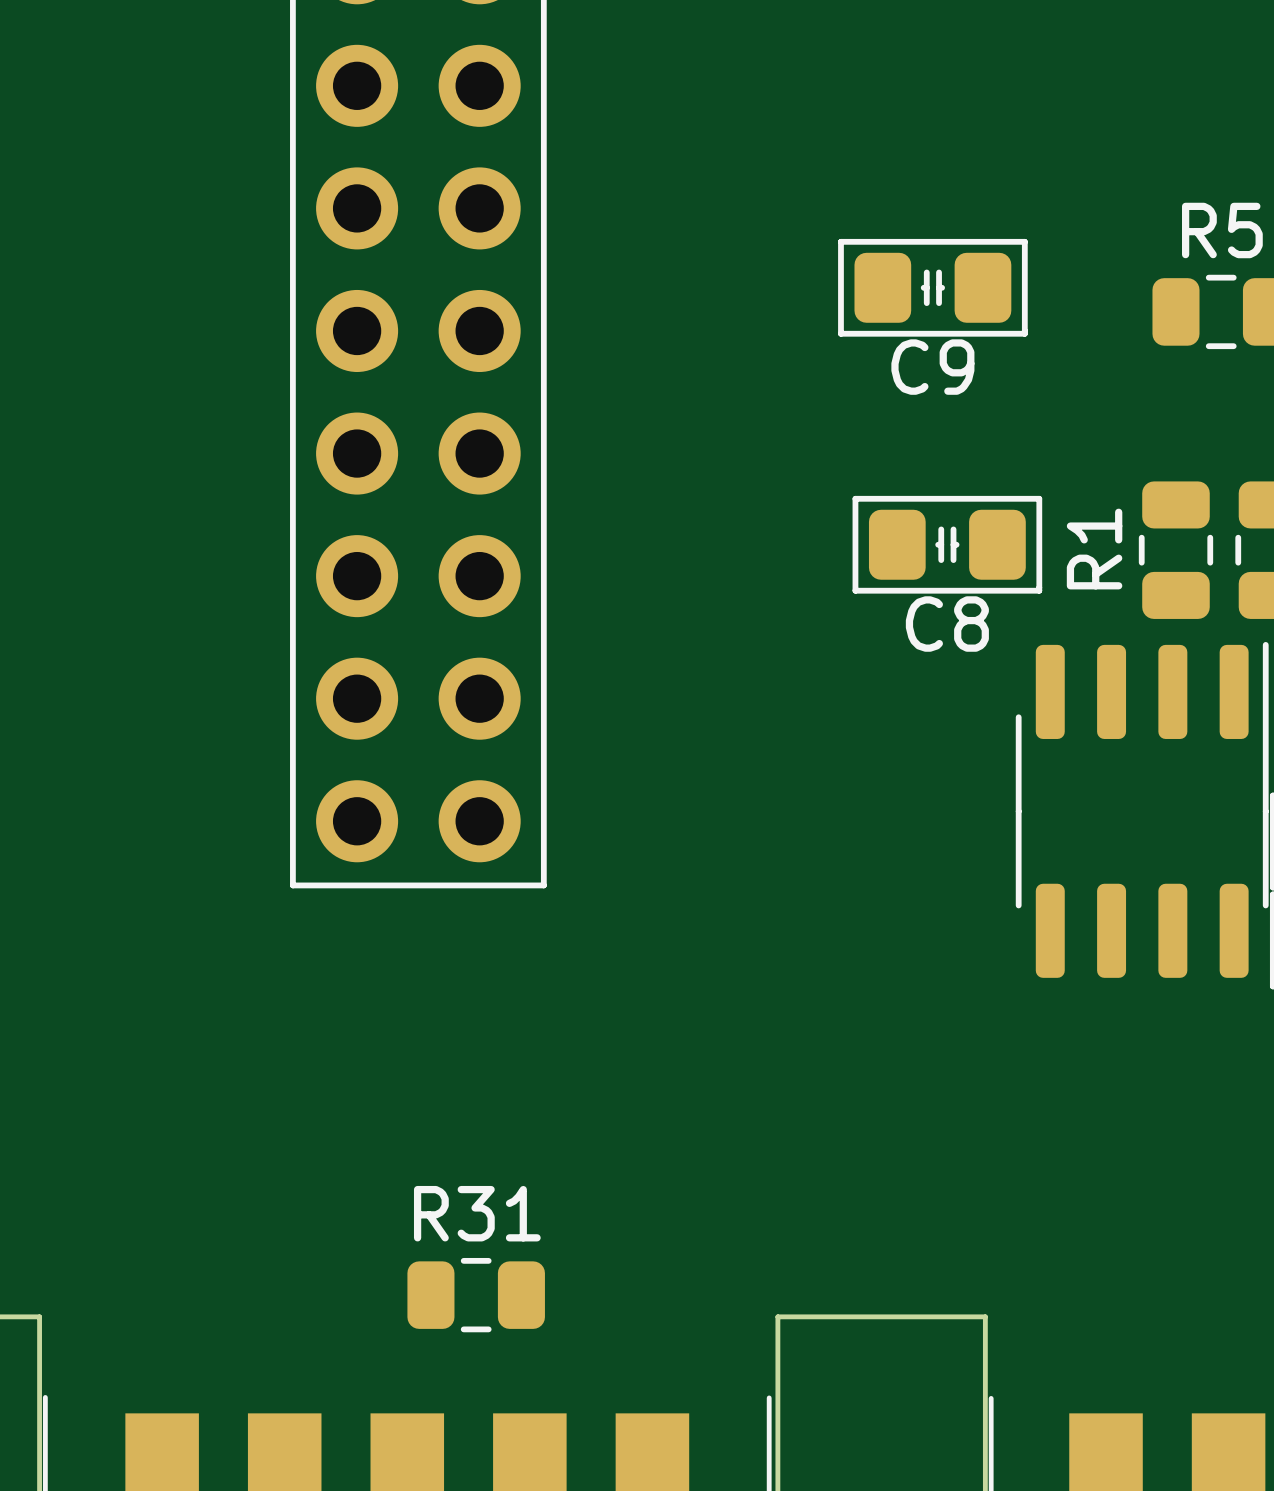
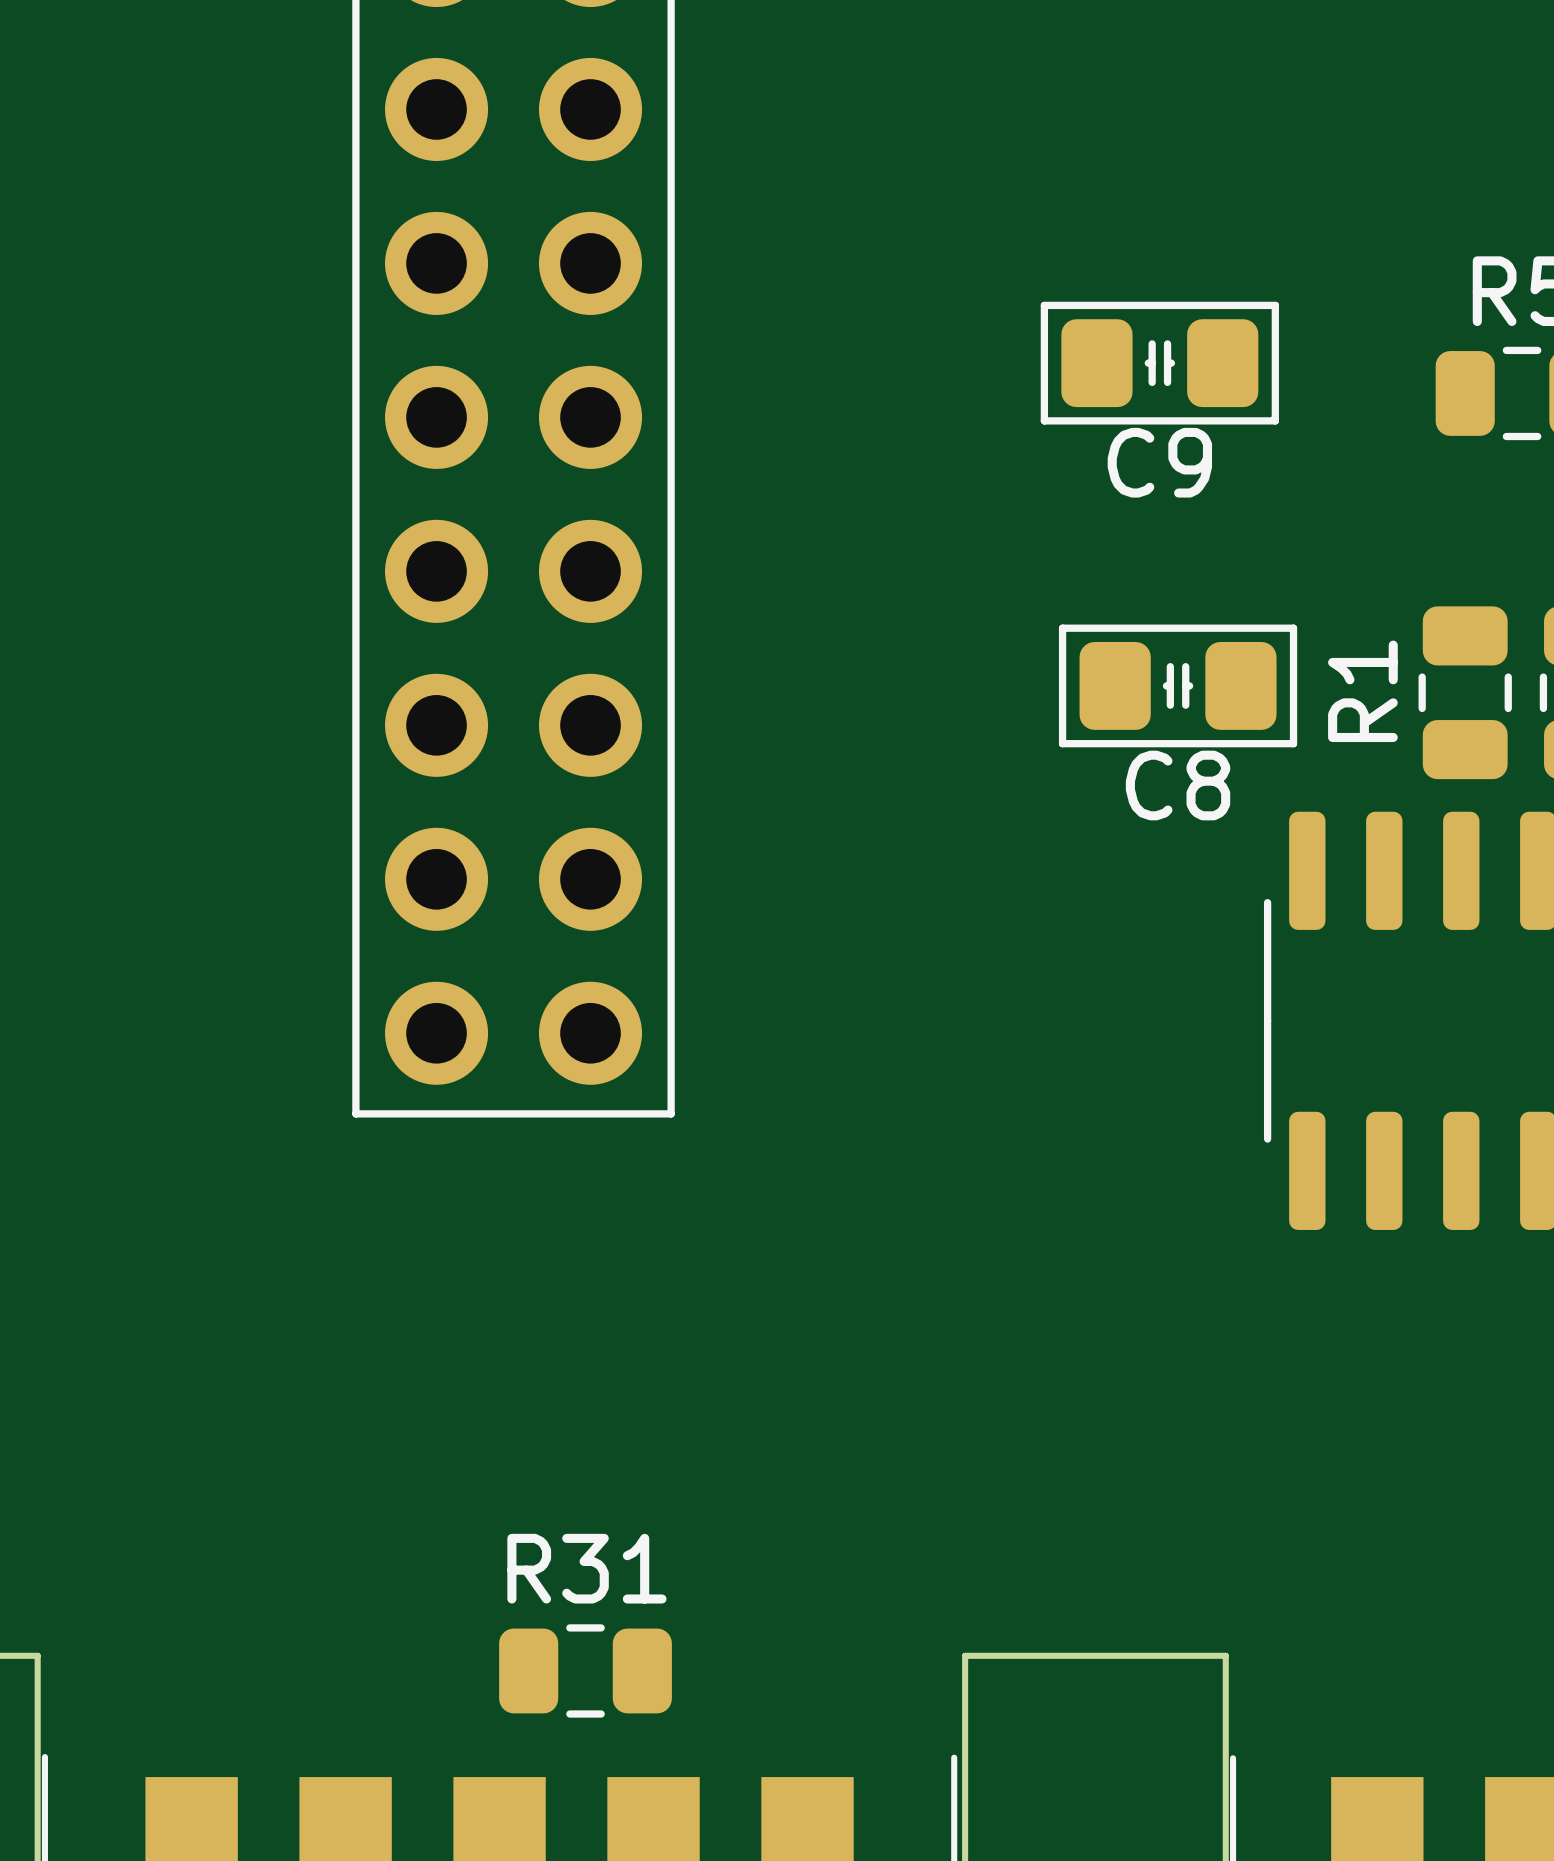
R31 position: (476, 1295) -> (585, 1670)

